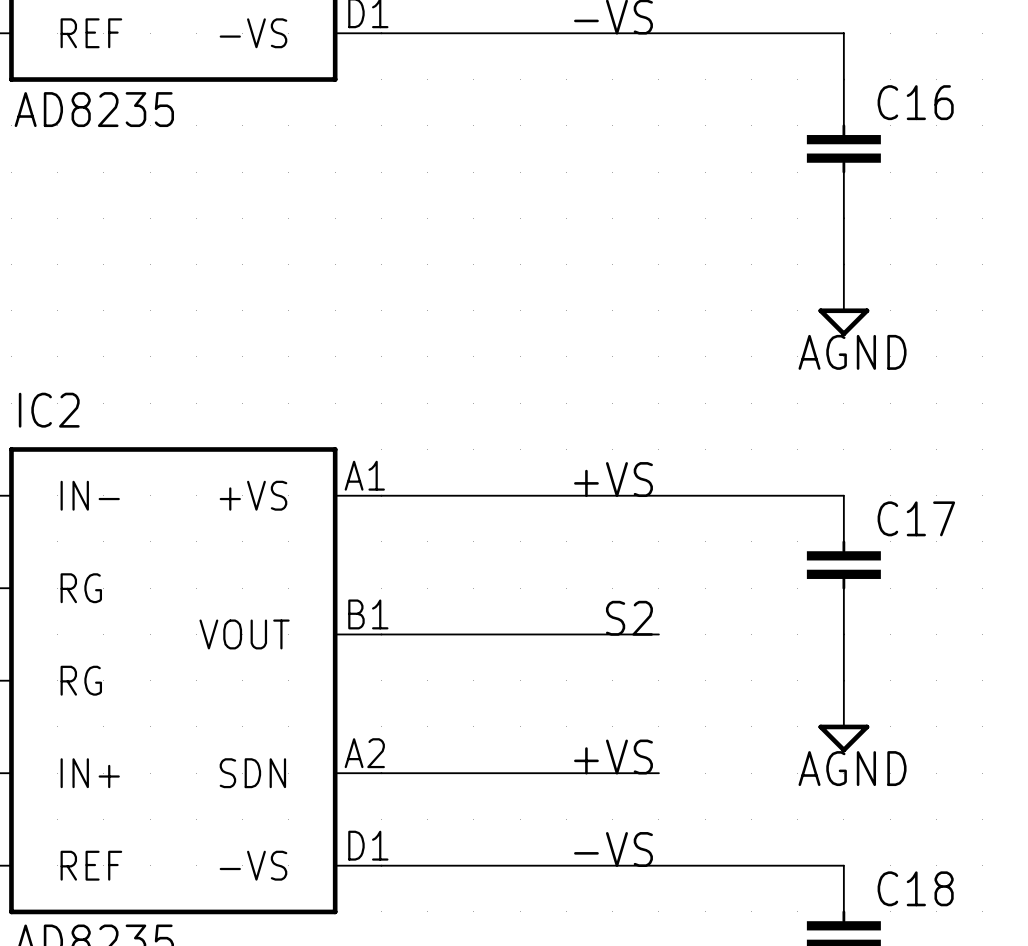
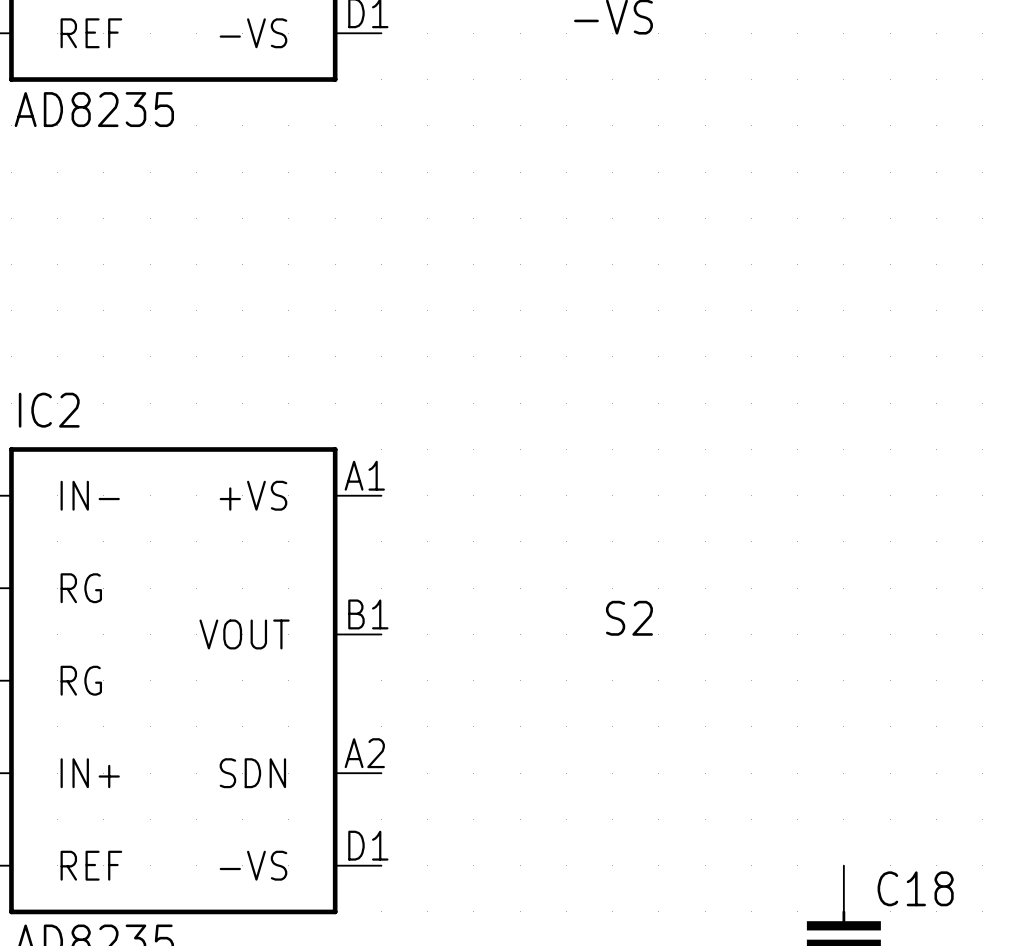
wire: (381, 33) (843, 33) (843, 79) -> none
C16: (843, 148) -> none
wire: (843, 218) (843, 264) -> none
power symbol: AGND (843, 300) -> none
label: +VS (613, 479) -> none
wire: (381, 495) (843, 495) -> none
C17: (843, 565) -> none
wire: (381, 634) (658, 634) -> none
wire: (843, 634) (843, 680) -> none
power symbol: AGND (843, 716) -> none
label: +VS (613, 757) -> none
wire: (381, 773) (658, 773) -> none
label: -VS (613, 849) -> none
wire: (381, 865) (843, 865) -> none

